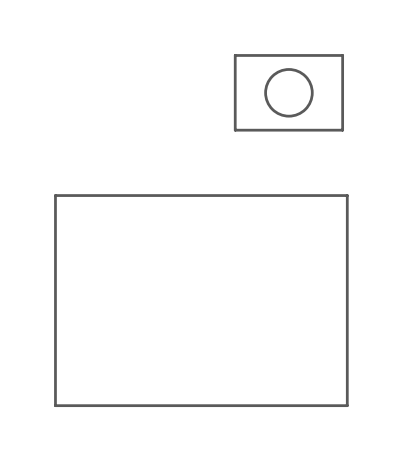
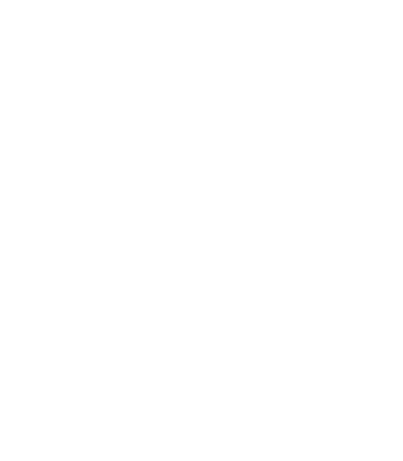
line: (235, 55) (235, 130) (342, 130) (342, 55) (235, 55) -> none
drawing: [264, 68, 314, 118] -> none
line: (55, 195) (55, 405) (347, 405) (347, 195) (55, 195) -> none

